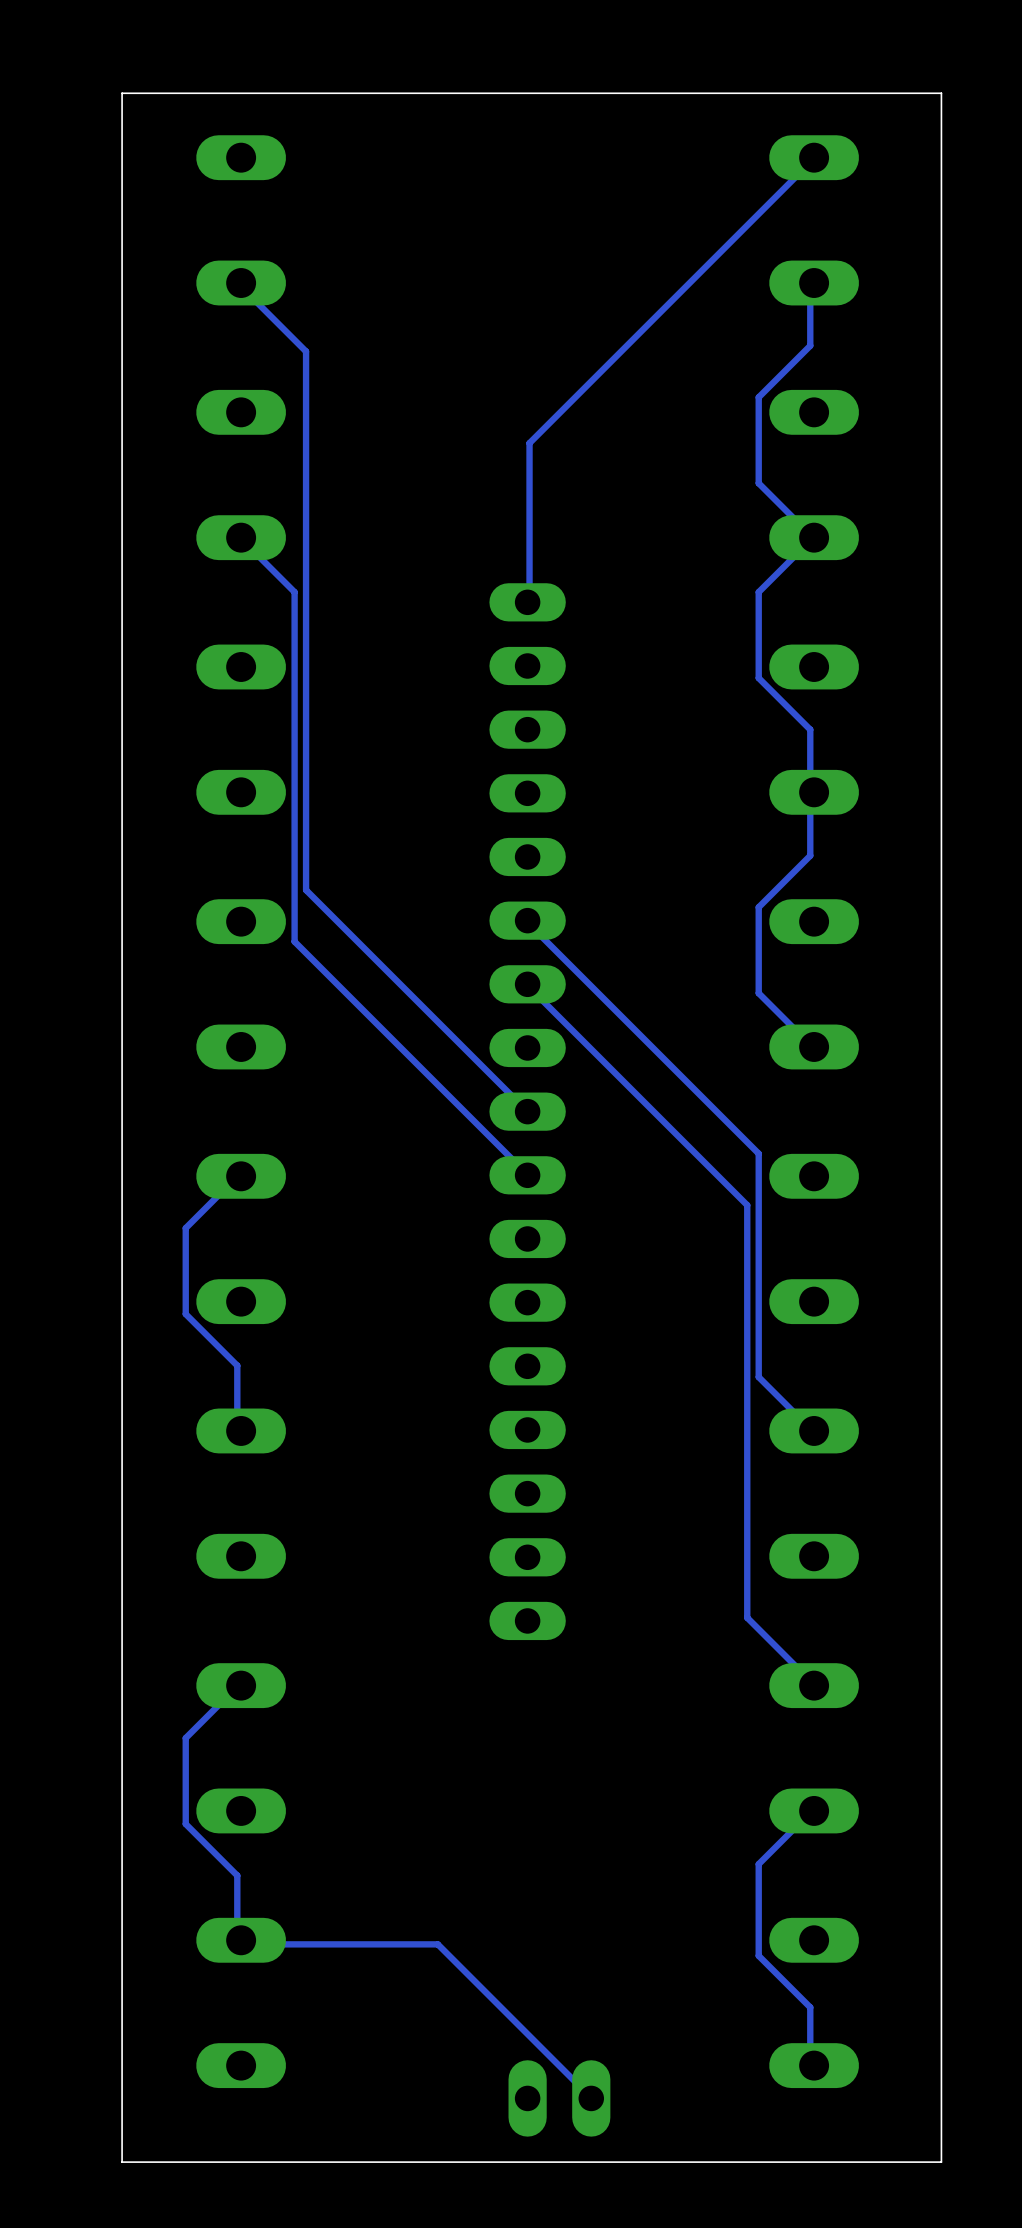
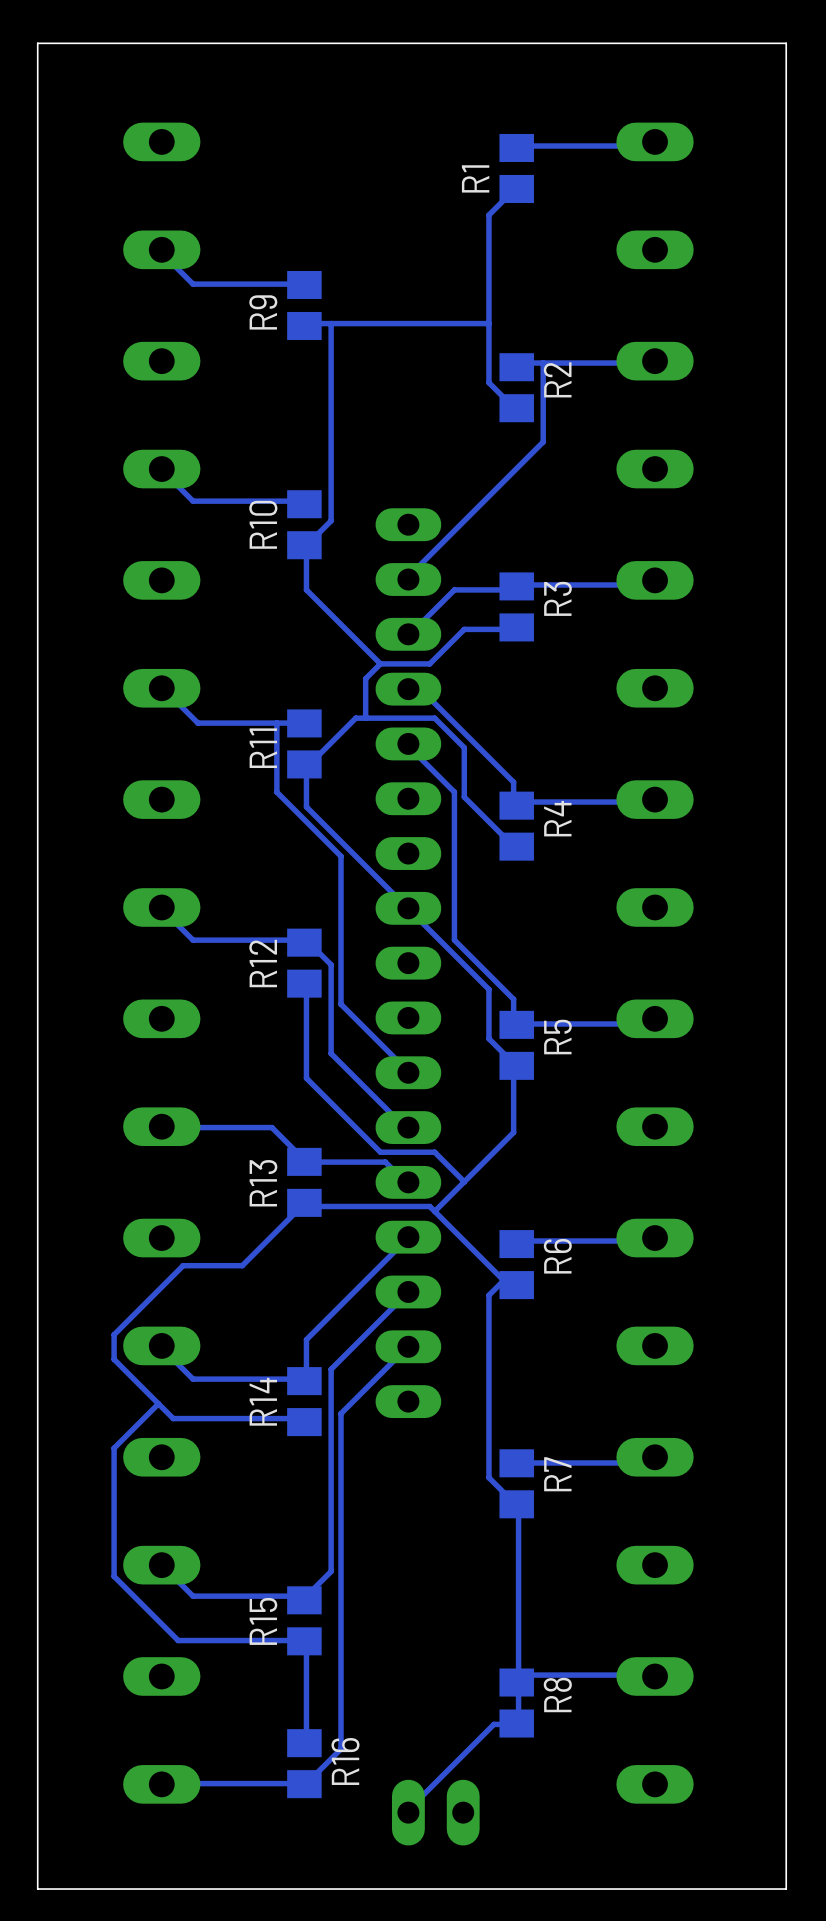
board edge: (941, 93) (122, 93) (122, 2162) (941, 2162) (941, 93) -> (786, 43) (786, 1889) (37, 1889) (37, 43) (786, 43)
track: (810, 162) (529, 443) (529, 597) (527, 602) -> (651, 146) (518, 146) (516, 147)
R1: none -> (516, 168)
track: none -> (516, 188) (488, 215) (488, 382) (513, 407) (516, 408)
track: (814, 283) (810, 288) (810, 345) (758, 397) (758, 483) (814, 537) (758, 592) (758, 678) (810, 729) (810, 786) (814, 792) (810, 792) (810, 855) (758, 907) (758, 993) (814, 1046) -> none
track: (277, 322) (306, 351) (306, 890) (527, 1111) -> (193, 284) (304, 284)
R9: none -> (304, 305)
track: none -> (331, 323) (331, 520) (306, 545)
track: none -> (488, 323) (306, 323) (304, 325)
track: none -> (655, 361) (651, 363) (518, 363) (516, 367)
track: none -> (543, 363) (543, 441) (410, 575) (408, 579)
R2: none -> (516, 387)
track: (277, 574) (294, 592) (294, 941) (527, 1175) -> (193, 501) (301, 501) (304, 504)
R10: none -> (304, 524)
track: none -> (306, 545) (306, 589) (380, 663)
track: none -> (655, 580) (651, 585) (518, 585) (513, 589) (454, 589) (408, 634)
R3: none -> (516, 606)
track: none -> (516, 627) (513, 629) (464, 629) (429, 663) (380, 663)
track: none -> (380, 663) (365, 678) (365, 718)
track: none -> (161, 688) (197, 723) (304, 723)
track: none -> (408, 689) (410, 693) (424, 693) (513, 782) (513, 802) (516, 805) (518, 802) (651, 802) (655, 799)
track: none -> (276, 723) (276, 792) (340, 856) (340, 1004) (408, 1072)
R11: none -> (304, 743)
track: none -> (408, 743) (454, 792) (454, 940) (513, 999) (513, 1023) (646, 1023) (651, 1019) (655, 1018)
track: none -> (306, 767) (355, 718) (434, 718) (464, 747) (464, 797) (513, 846) (516, 846)
track: none -> (306, 767) (306, 806) (488, 989) (488, 1038) (516, 1065) (513, 1068) (513, 1132) (434, 1211)
track: (527, 920) (758, 1153) (758, 1377) (814, 1430) -> (516, 1244) (518, 1241) (651, 1241) (655, 1238)
R4: none -> (516, 826)
track: (527, 984) (747, 1205) (747, 1617) (814, 1685) -> (516, 1463) (646, 1462) (655, 1457)
track: none -> (161, 907) (193, 940) (301, 940) (304, 942) (306, 940) (331, 964) (331, 1053) (405, 1127) (408, 1127)
R12: none -> (304, 963)
track: none -> (304, 983) (306, 984) (306, 1078) (380, 1152) (434, 1152) (464, 1181)
track: (241, 1176) (237, 1176) (185, 1228) (185, 1314) (237, 1365) (237, 1428) (241, 1430) -> none
R5: none -> (516, 1045)
track: none -> (161, 1126) (271, 1127) (304, 1161) (385, 1162) (405, 1181) (408, 1182)
R13: none -> (304, 1182)
track: none -> (408, 1237) (306, 1339) (306, 1379) (304, 1381) (301, 1379) (193, 1379) (161, 1345)
R6: none -> (516, 1264)
track: none -> (503, 1280) (429, 1206) (306, 1206) (304, 1202) (242, 1265) (183, 1265) (114, 1334) (114, 1359) (173, 1418) (301, 1418) (304, 1422)
track: none -> (503, 1280) (488, 1295) (488, 1477) (518, 1507) (518, 1680) (516, 1682)
track: none -> (408, 1291) (331, 1369) (331, 1571) (304, 1600) (301, 1596) (193, 1596) (161, 1565)
track: none -> (408, 1346) (340, 1413) (340, 1749) (304, 1784) (161, 1784)
R14: none -> (304, 1401)
track: (241, 1685) (237, 1686) (185, 1738) -> (158, 1403) (114, 1448) (114, 1502)
R7: none -> (516, 1483)
track: (814, 1810) (758, 1864) (758, 1955) (810, 2007) (810, 2064) (814, 2065) -> none
track: (237, 1875) (237, 1938) (241, 1940) (243, 1944) (437, 1944) (591, 2098) -> (158, 1620) (178, 1640) (304, 1641) (306, 1645) (306, 1739) (304, 1743)
R15: none -> (304, 1620)
track: none -> (655, 1676) (518, 1675) (516, 1682)
track: none -> (516, 1682) (518, 1684) (518, 1719) (516, 1723) (493, 1724) (410, 1808) (408, 1812)
R8: none -> (516, 1703)
R16: none -> (304, 1763)

